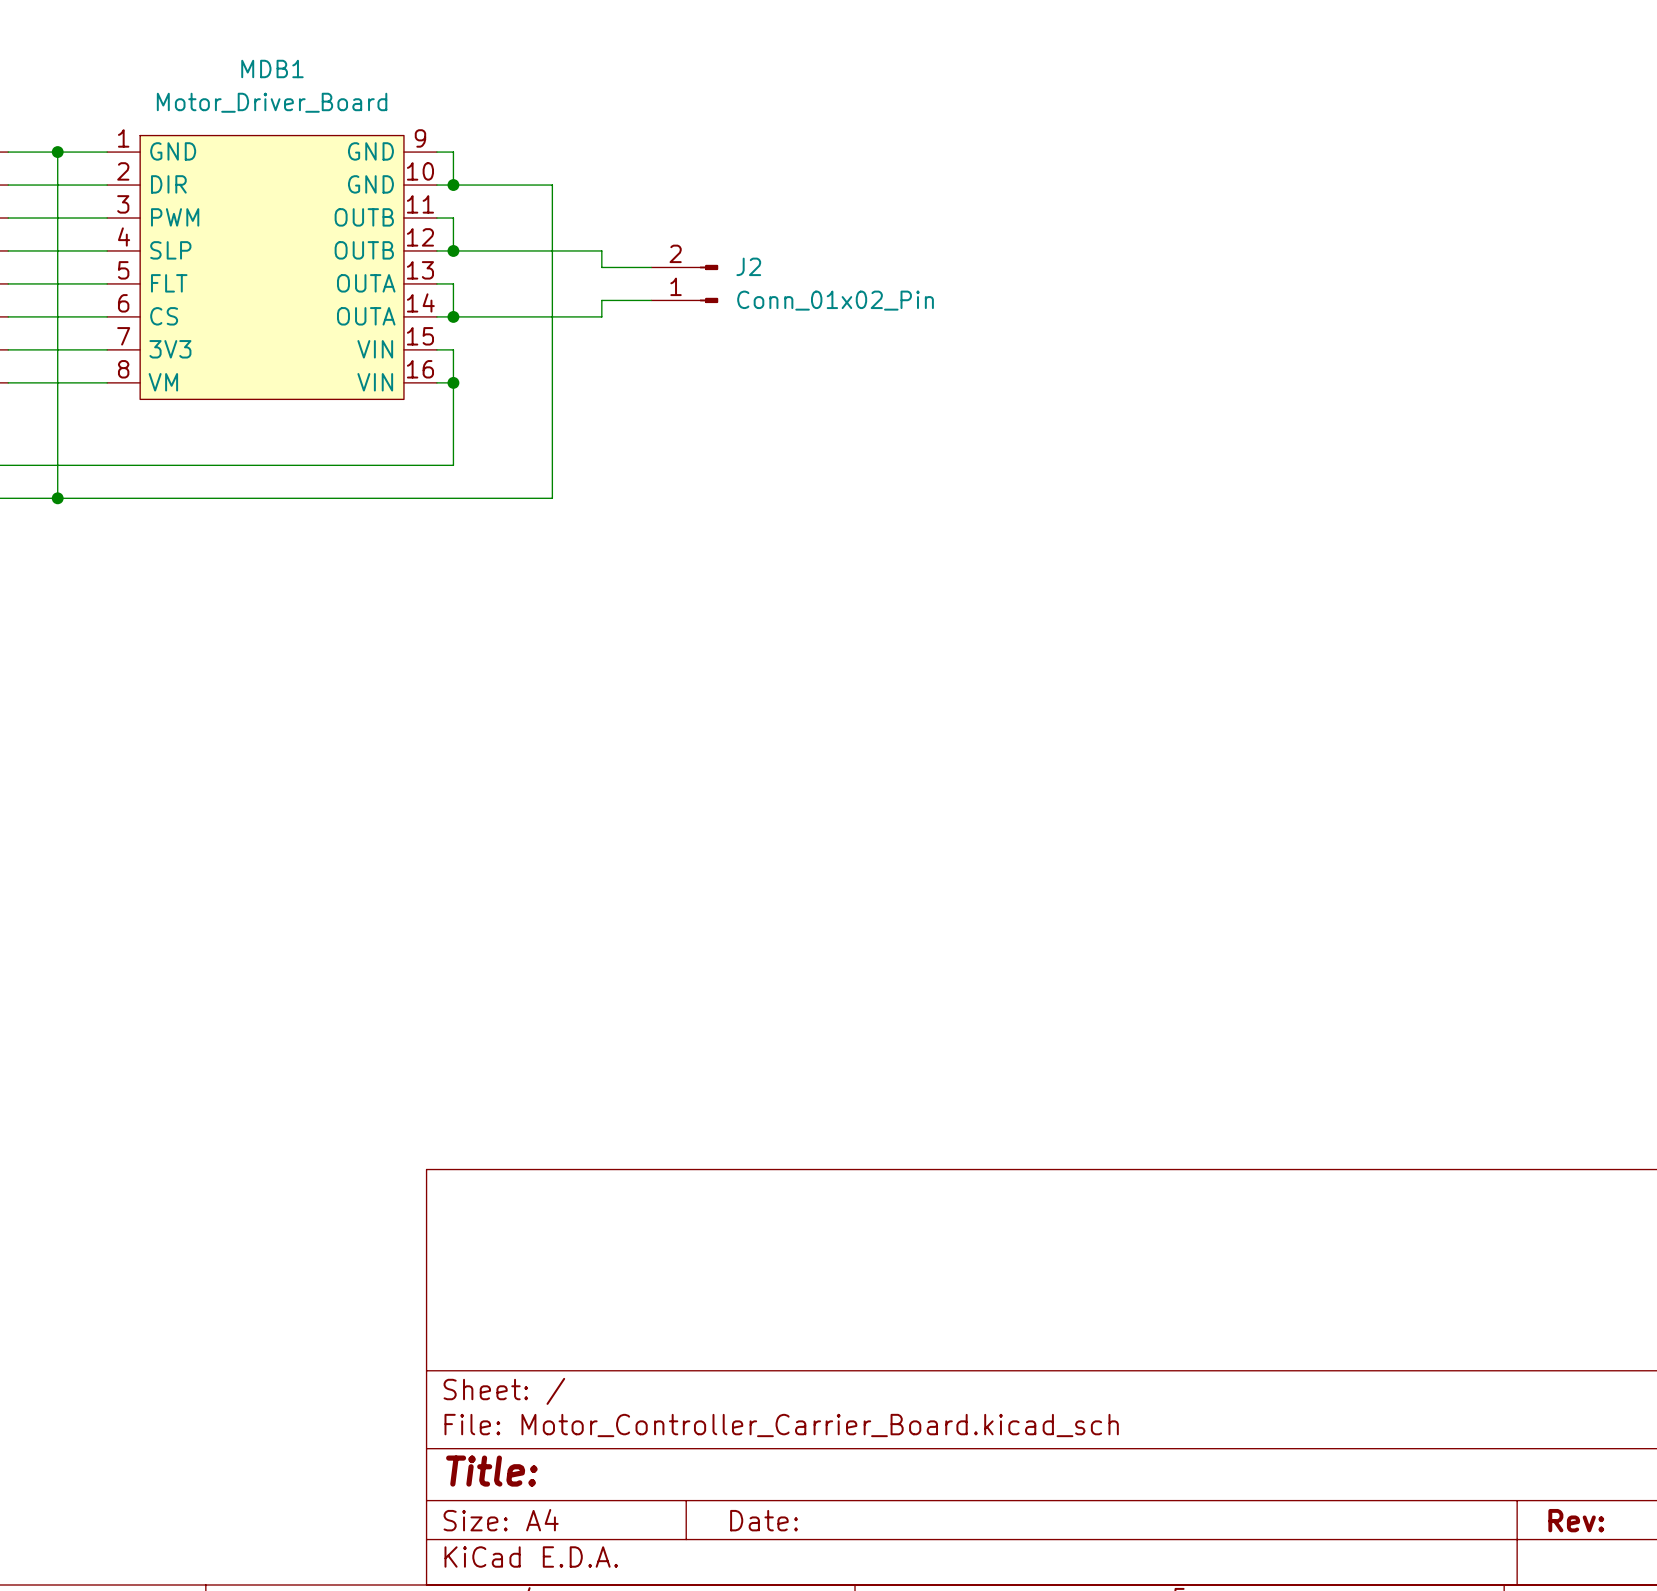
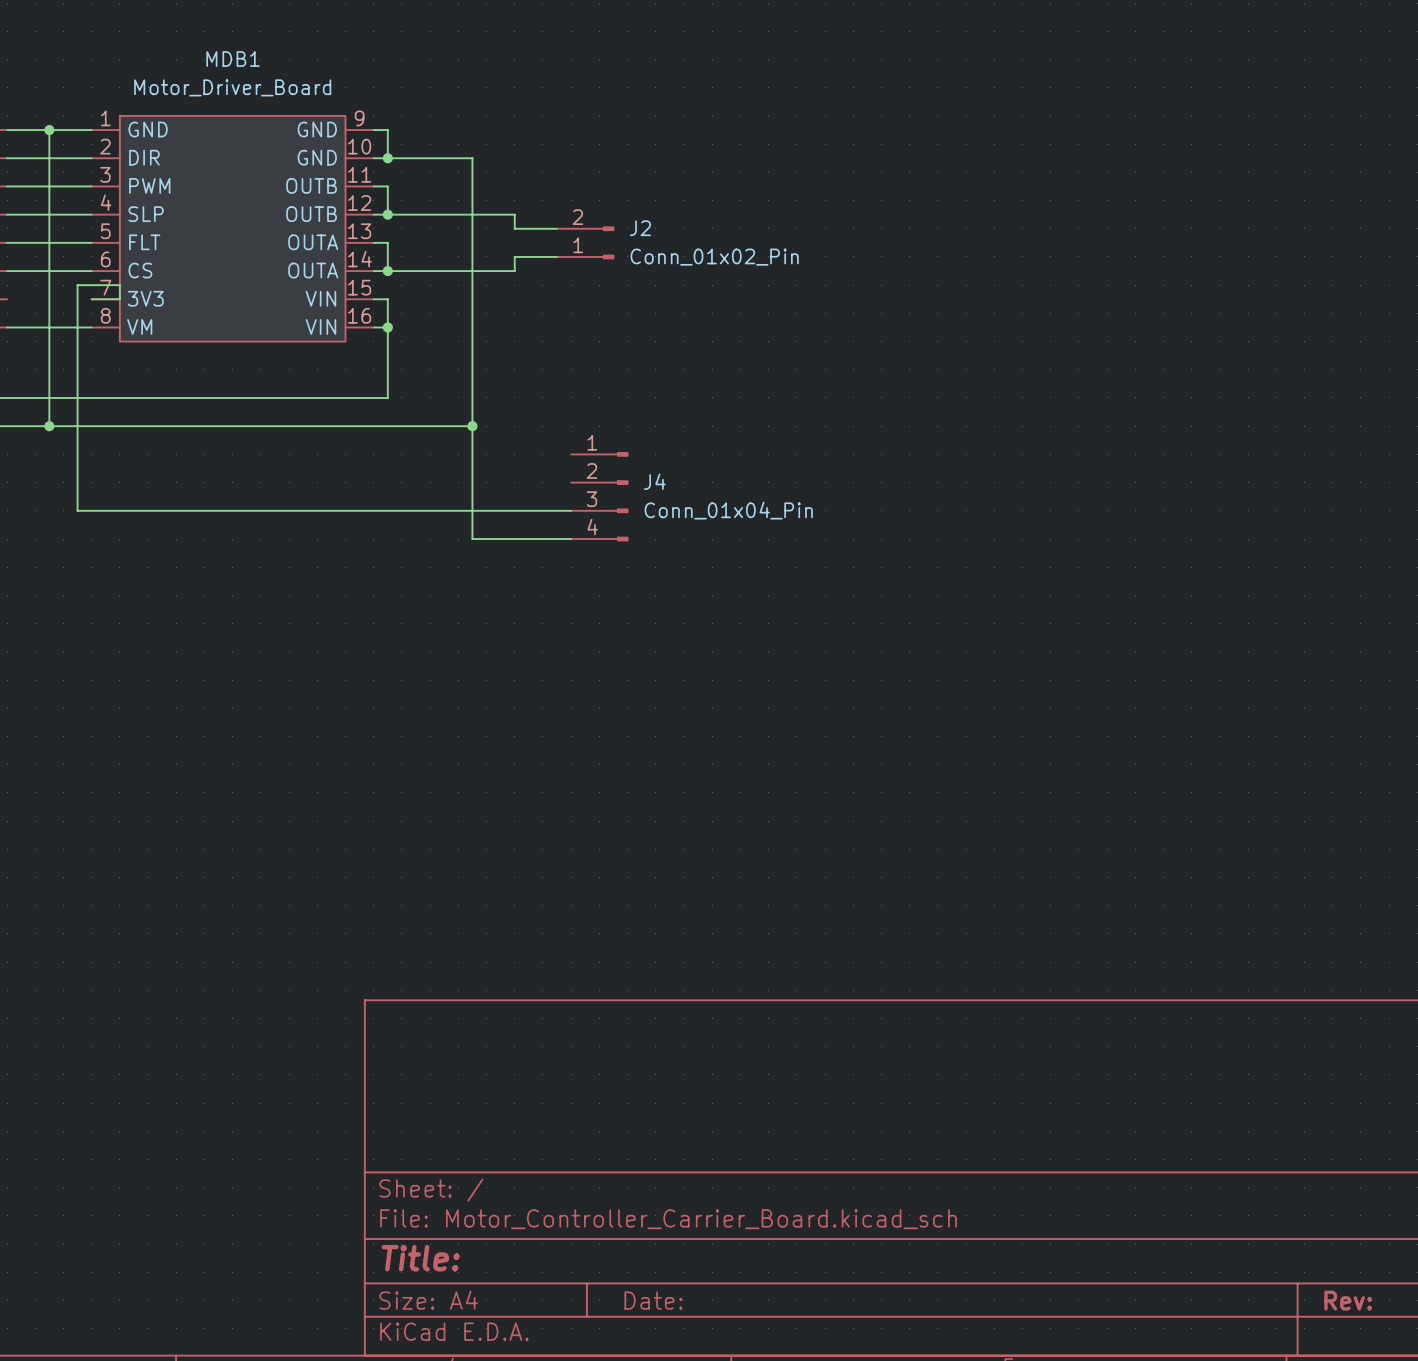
wire: (8, 349) (107, 349) -> (571, 510) (77, 510) (77, 285) (119, 285) (119, 299) (91, 299)
wire: none -> (472, 426) (472, 539) (571, 539)
junction: none -> (472, 426)
J4: none -> Conn_01x04_Pin (599, 496)

